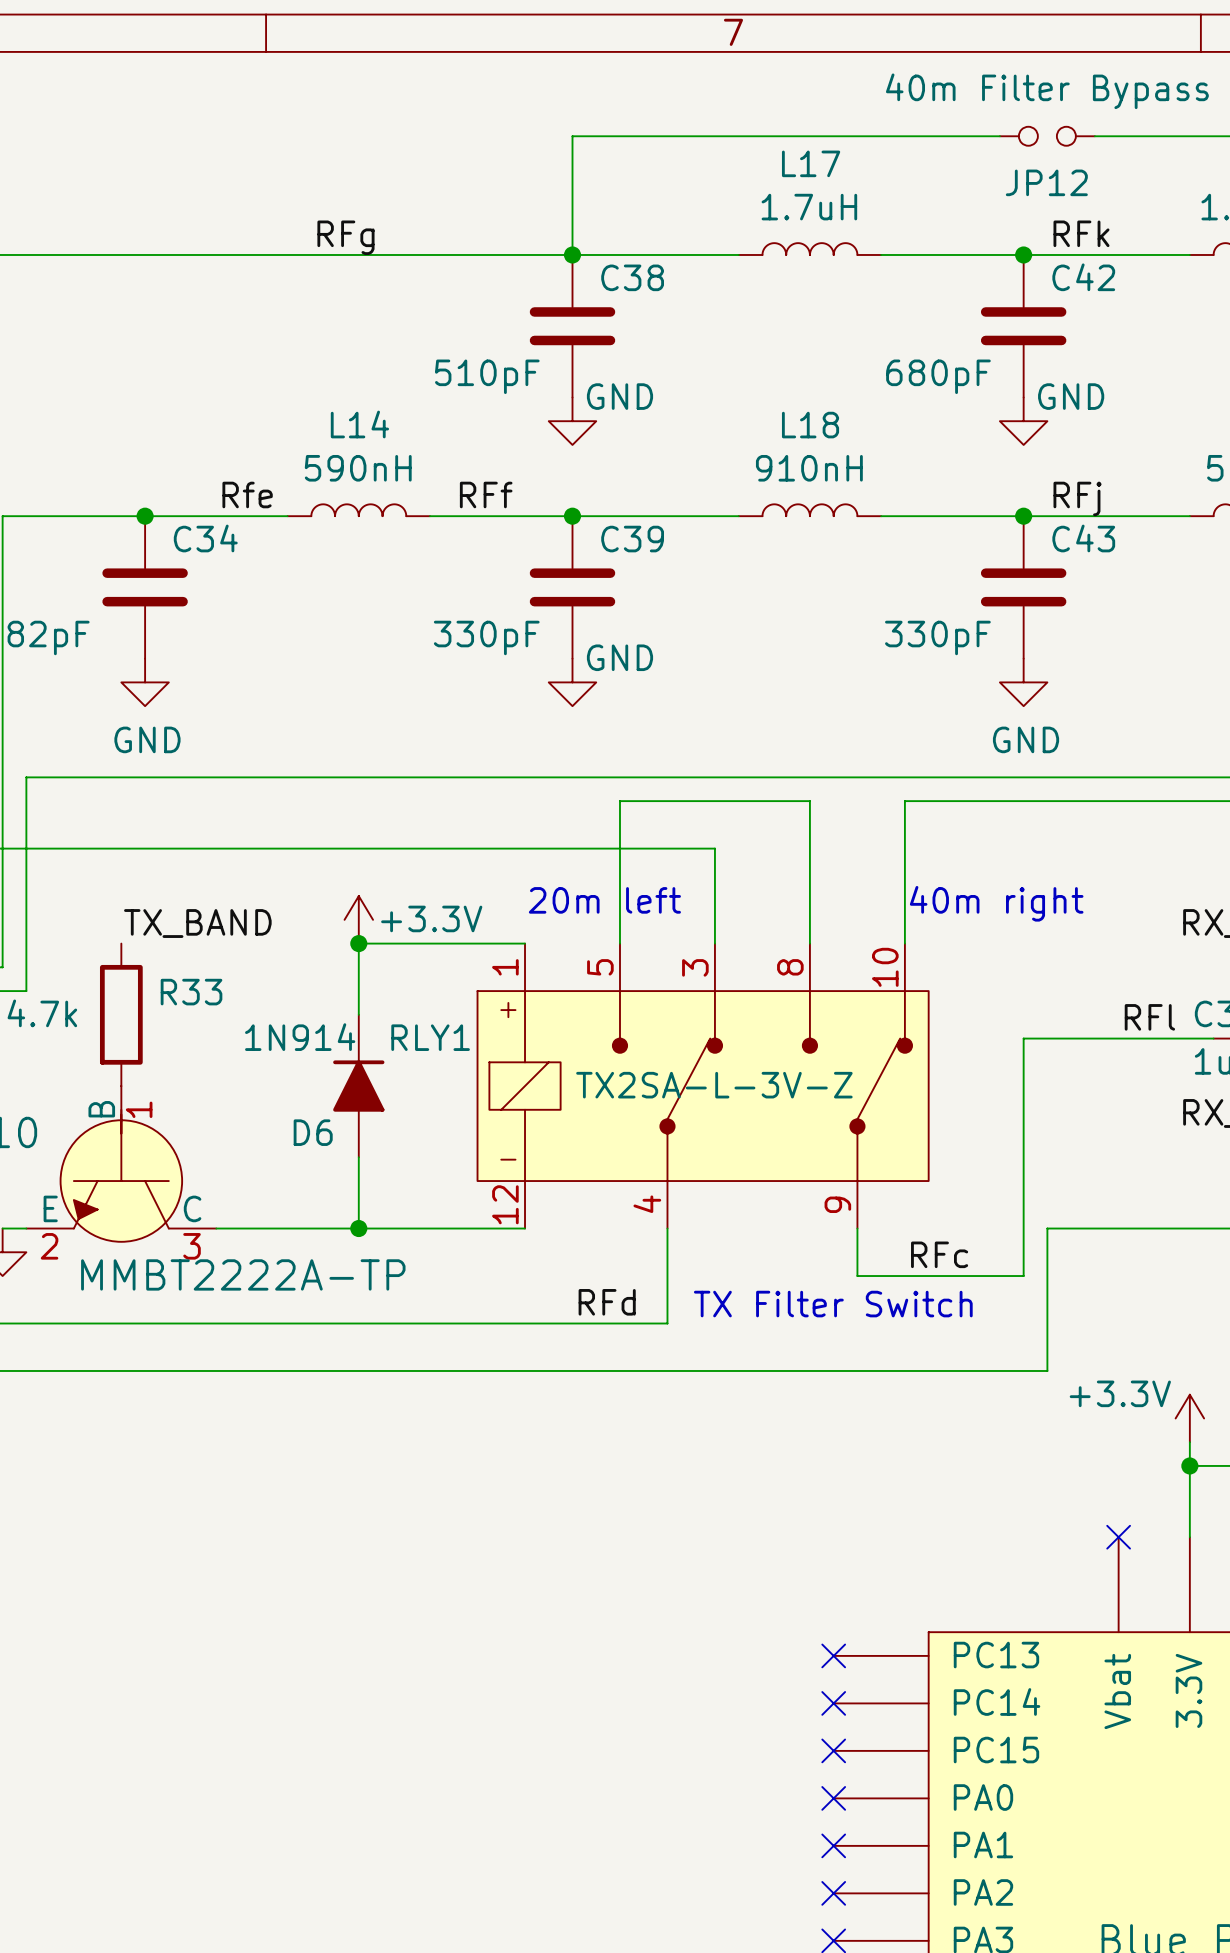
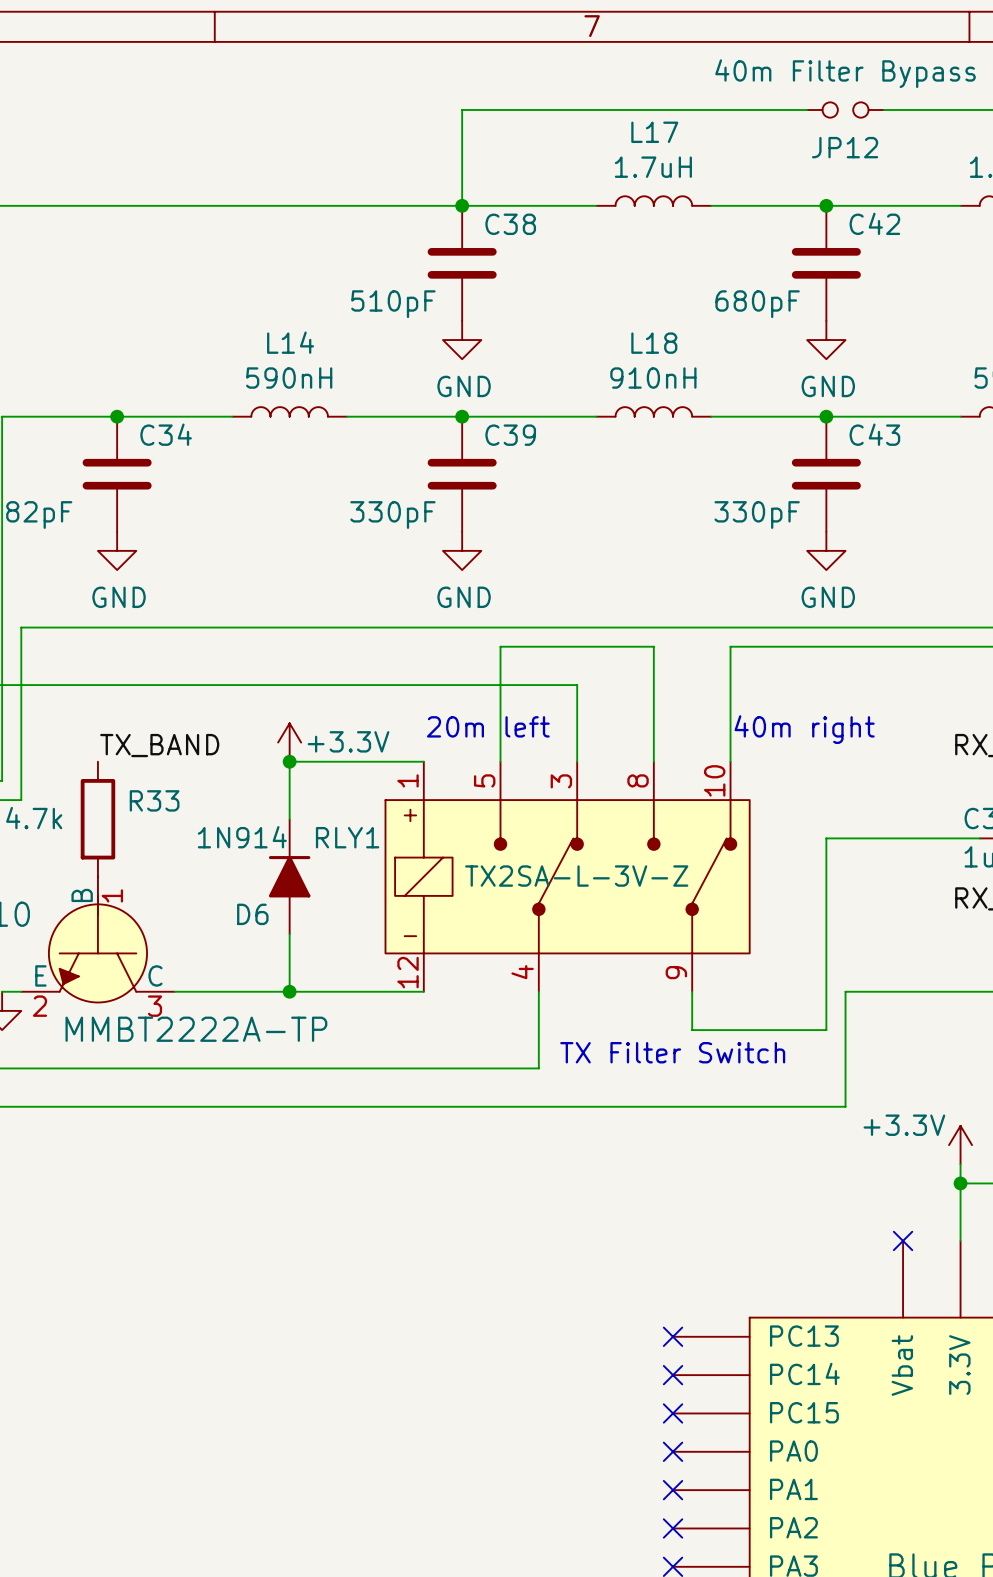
label: RFk (1081, 233) -> none
label: RFg (345, 237) -> none
power symbol text position: GND (619, 396) -> GND (464, 386)
power symbol text position: GND (1071, 396) -> GND (828, 386)
label: Rfe (247, 494) -> none
label: RFf (486, 494) -> none
label: RFj (1077, 498) -> none
power symbol text position: GND (619, 657) -> GND (464, 597)
label: RFl (1149, 1017) -> none
label: RFc (939, 1254) -> none
label: RFd (607, 1302) -> none

